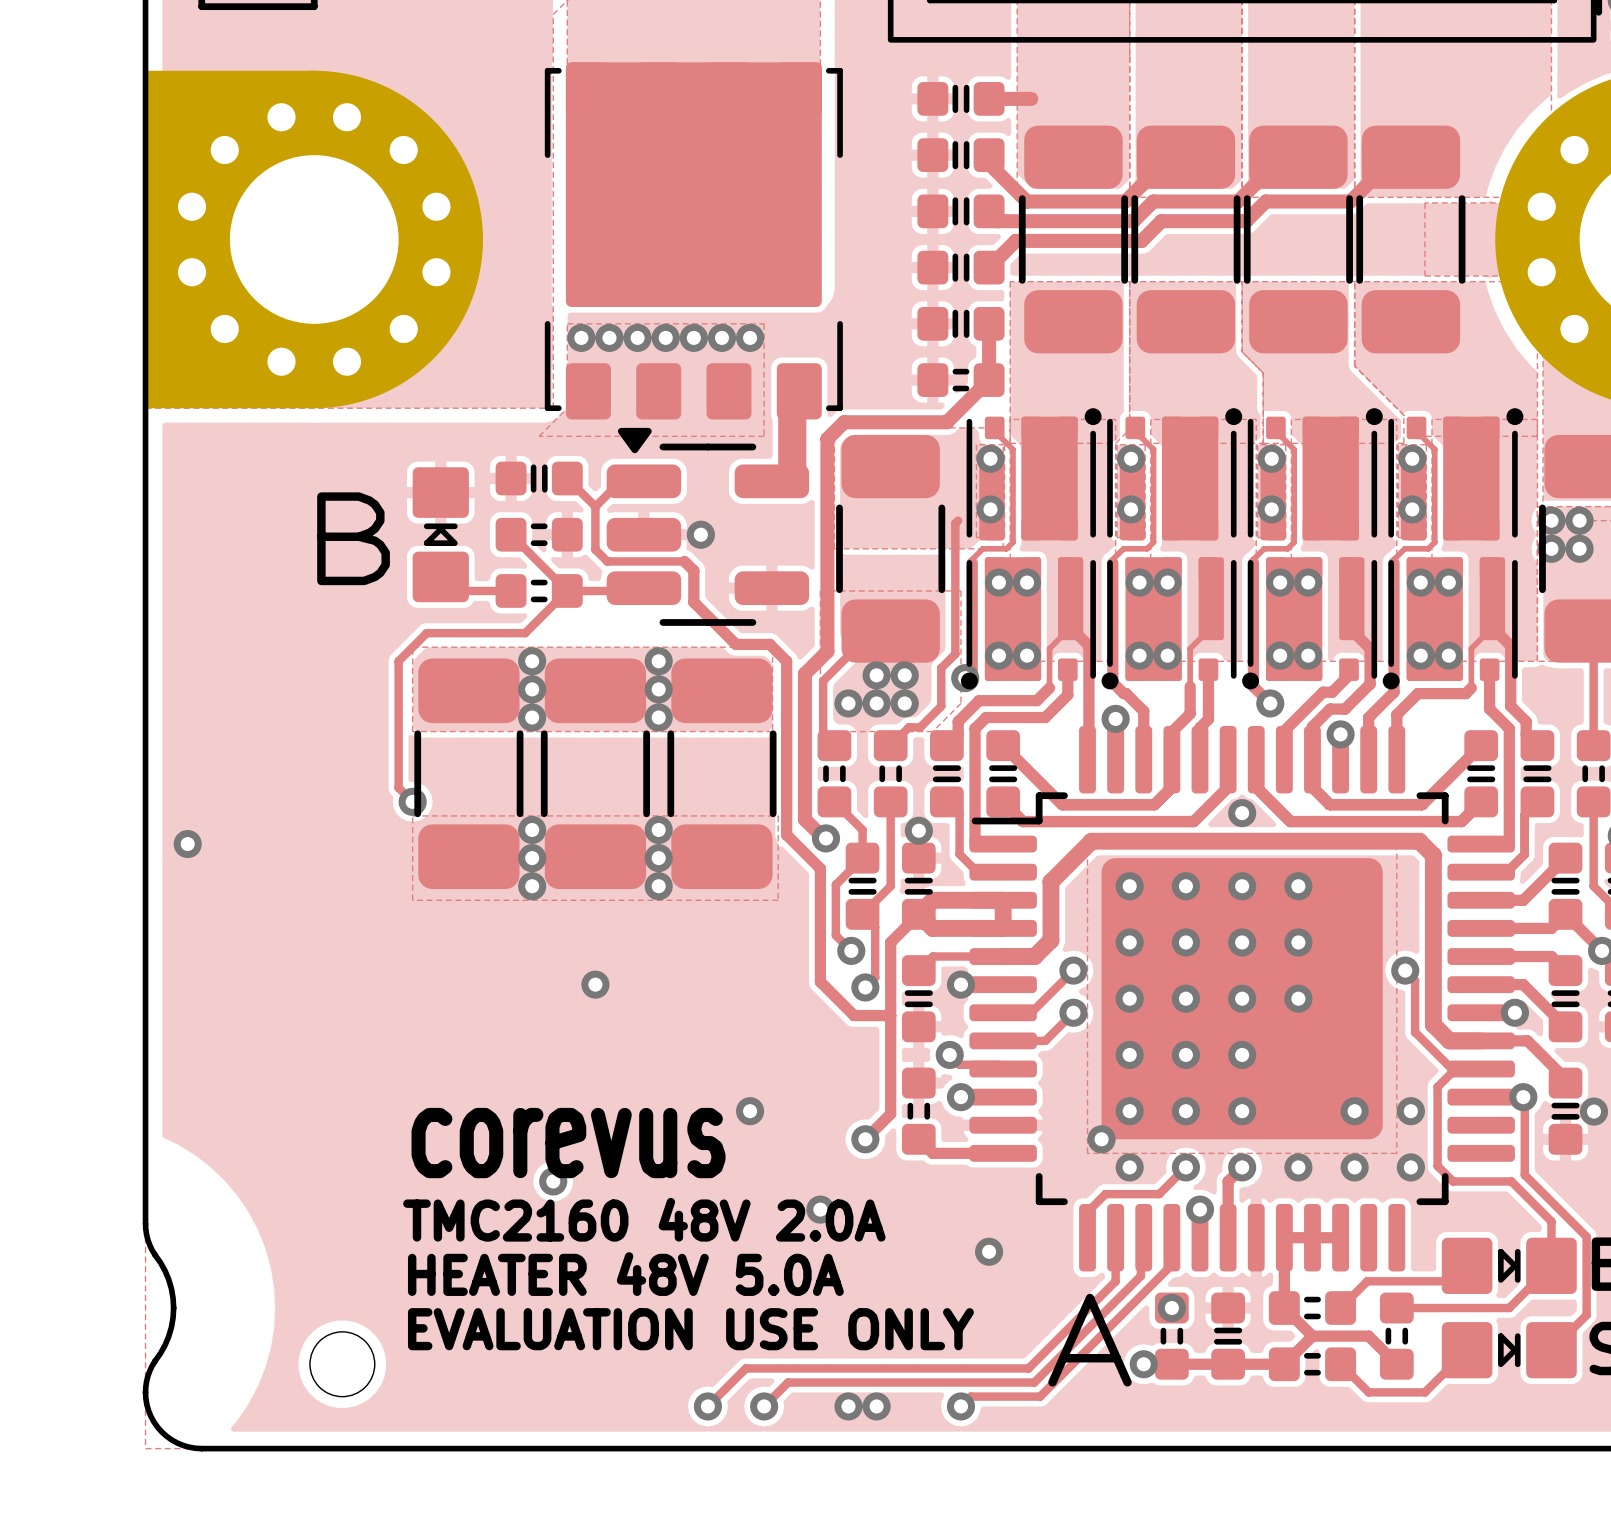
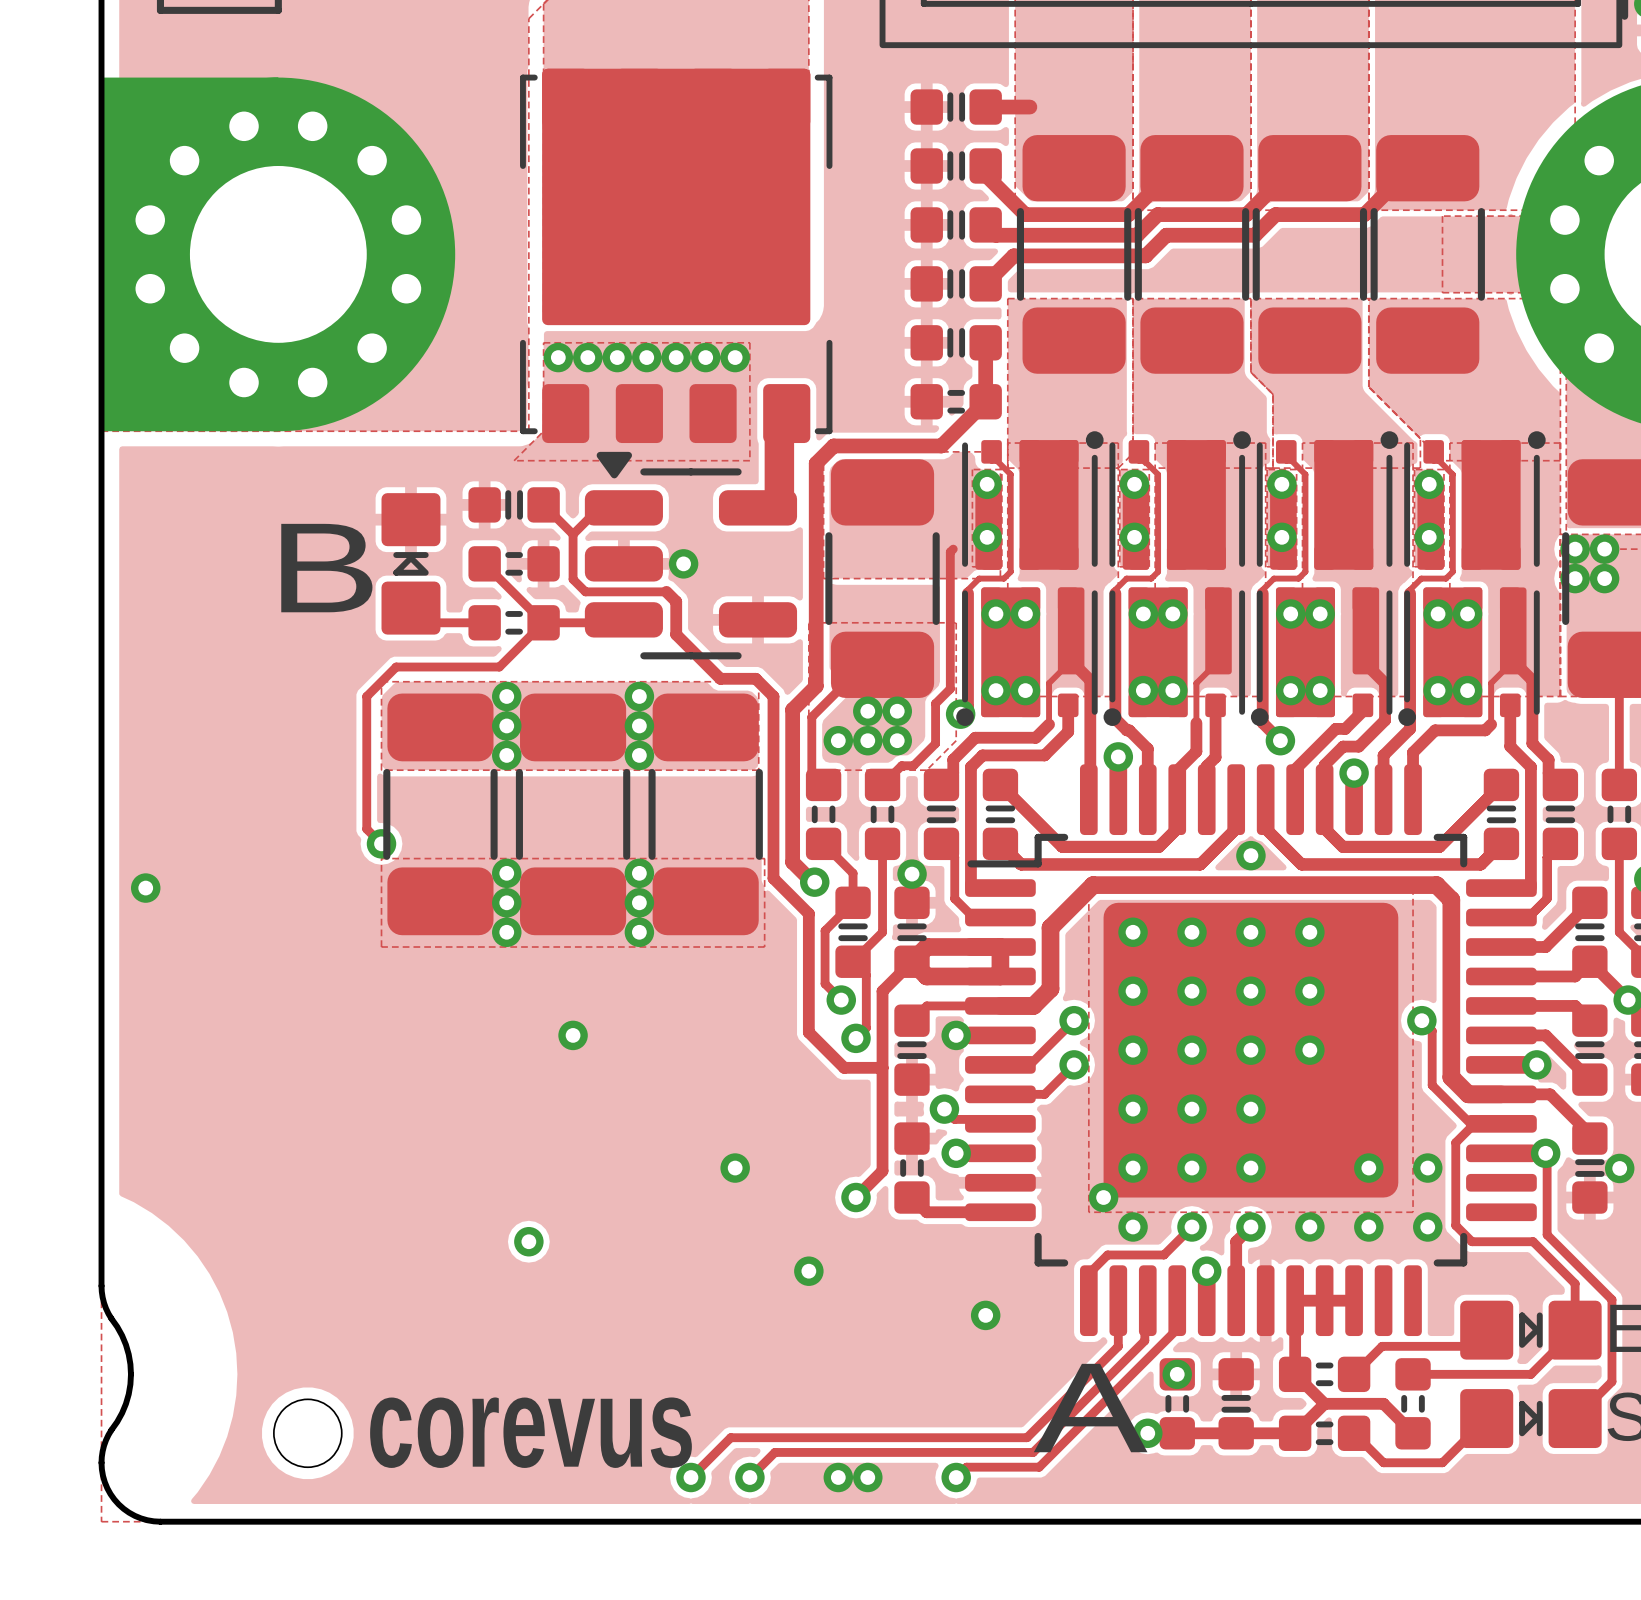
text position: corevus (568, 1143) -> corevus (530, 1432)
text: TMC2160 48V 2.0A (644, 1219) -> none
text: HEATER 48V 5.0A (625, 1274) -> none
text: EVALUATION USE ONLY (690, 1329) -> none

